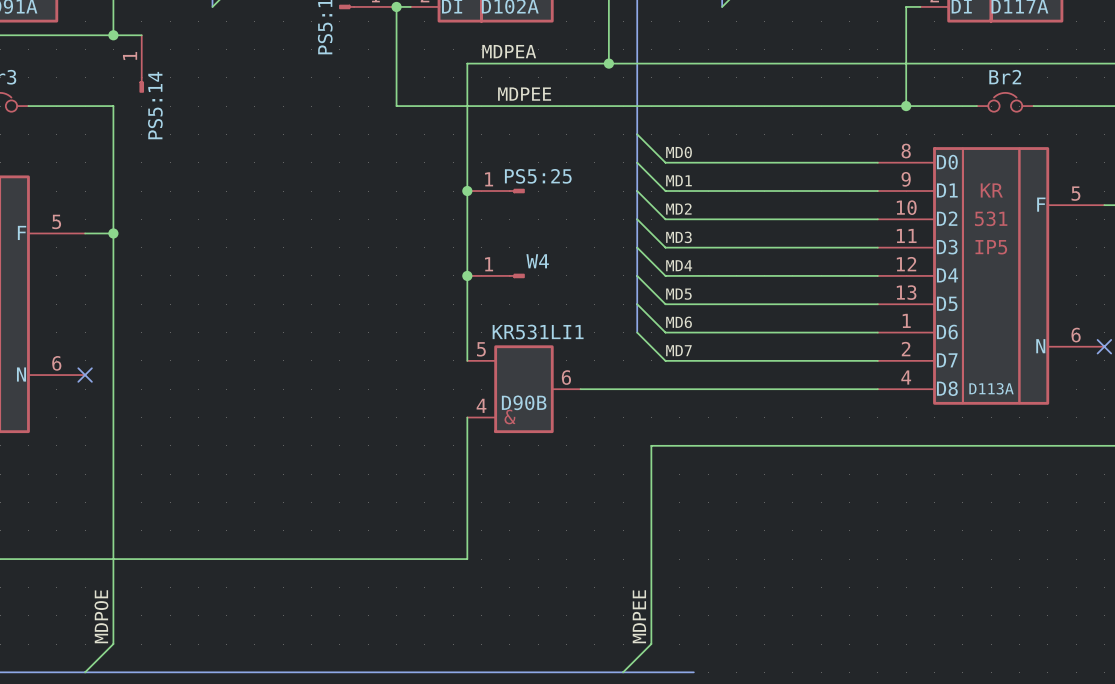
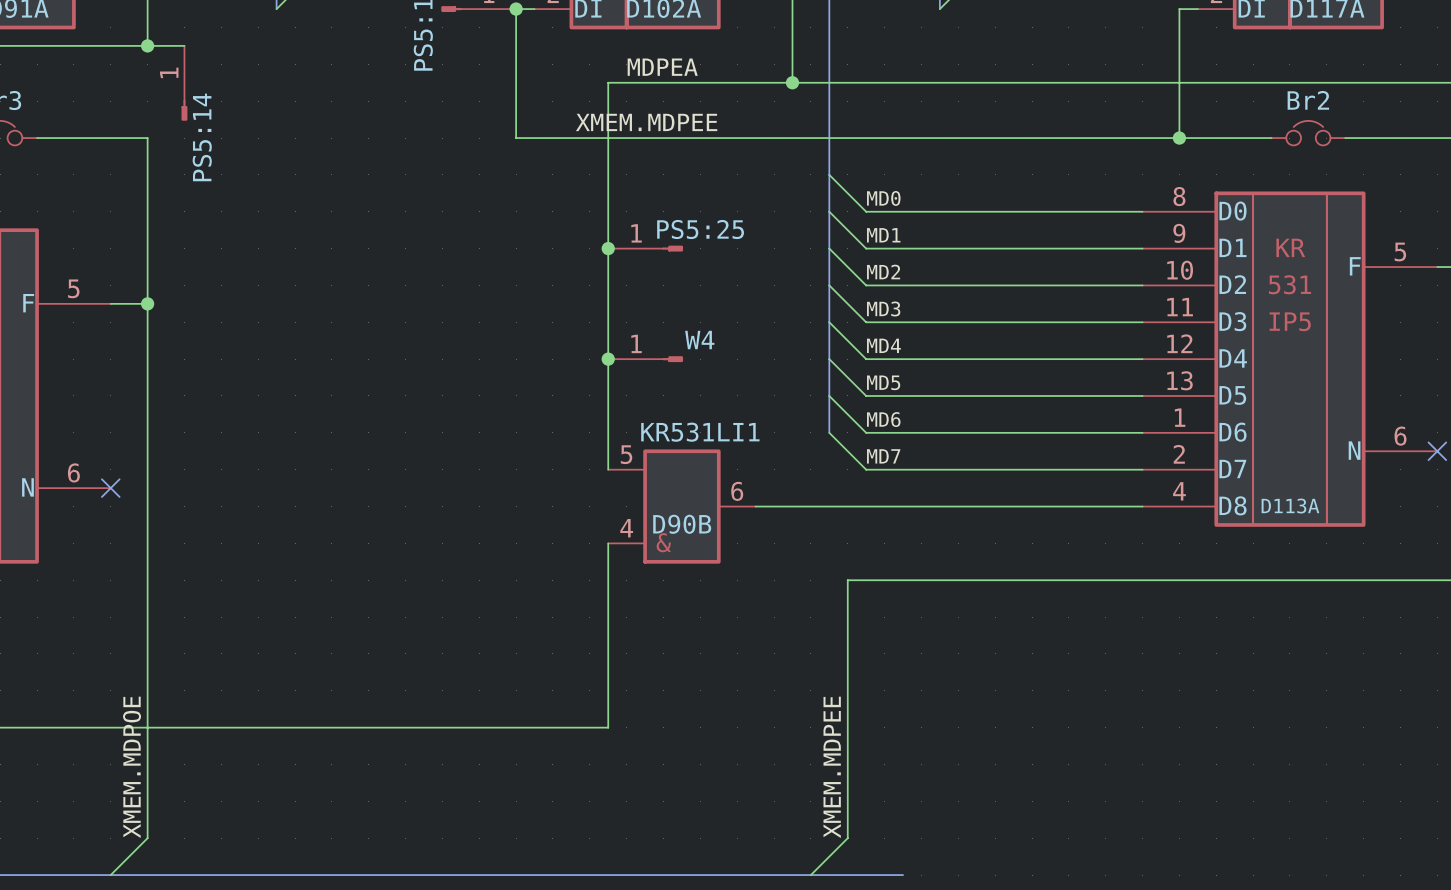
label: MDPEE (524, 94) -> XMEM.MDPEE (646, 122)
label: MDPOE (101, 616) -> XMEM.MDPOE (132, 767)
label: MDPEE (639, 616) -> XMEM.MDPEE (832, 767)

